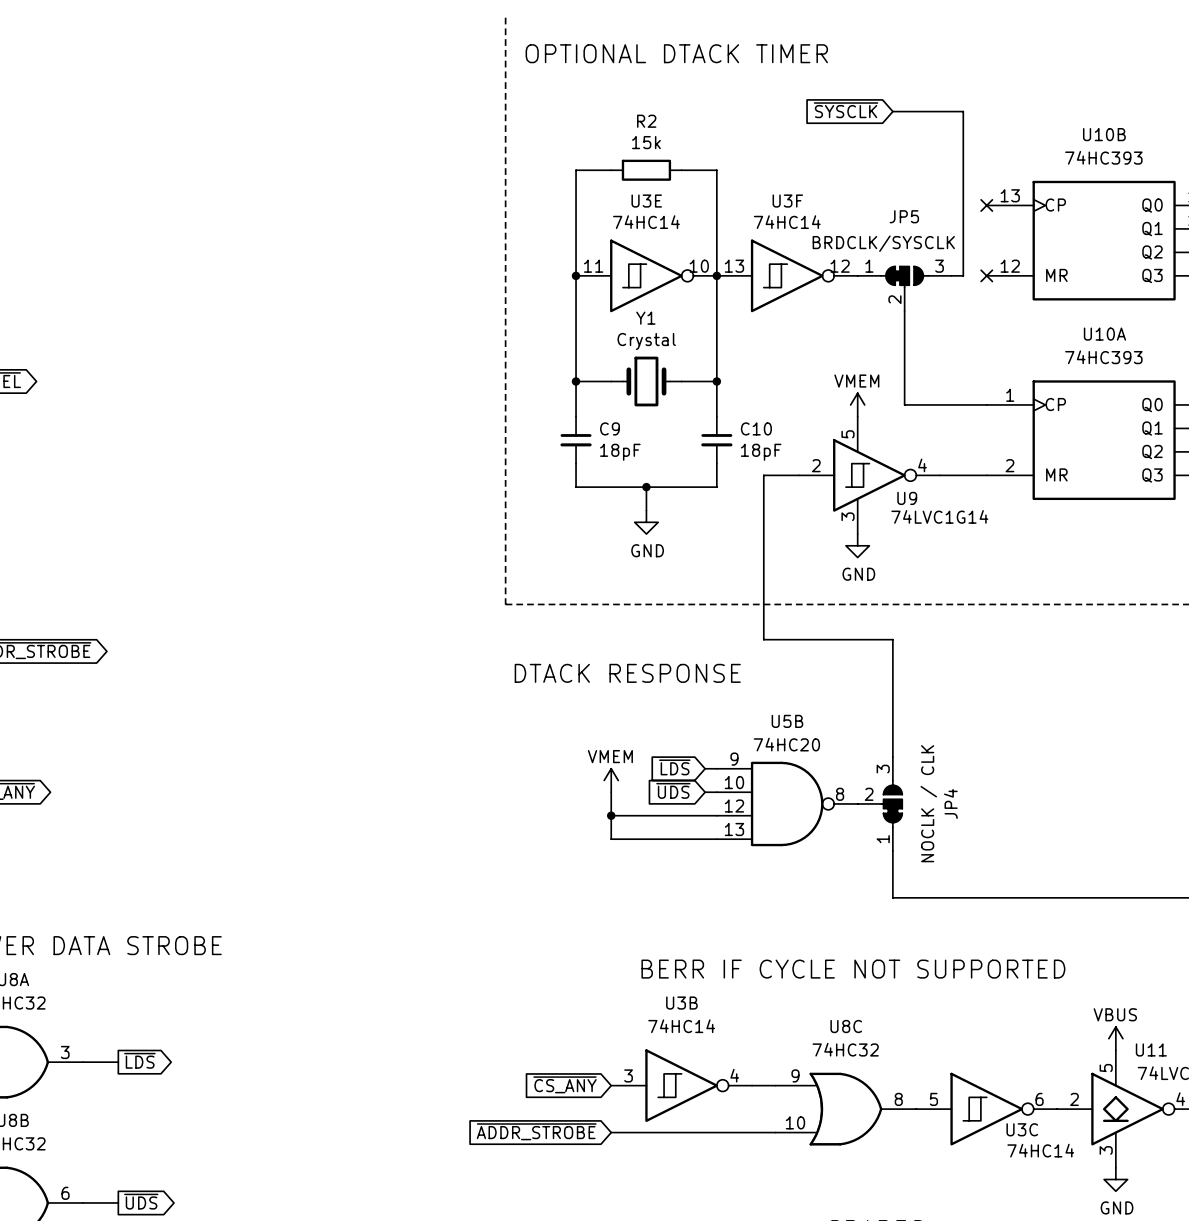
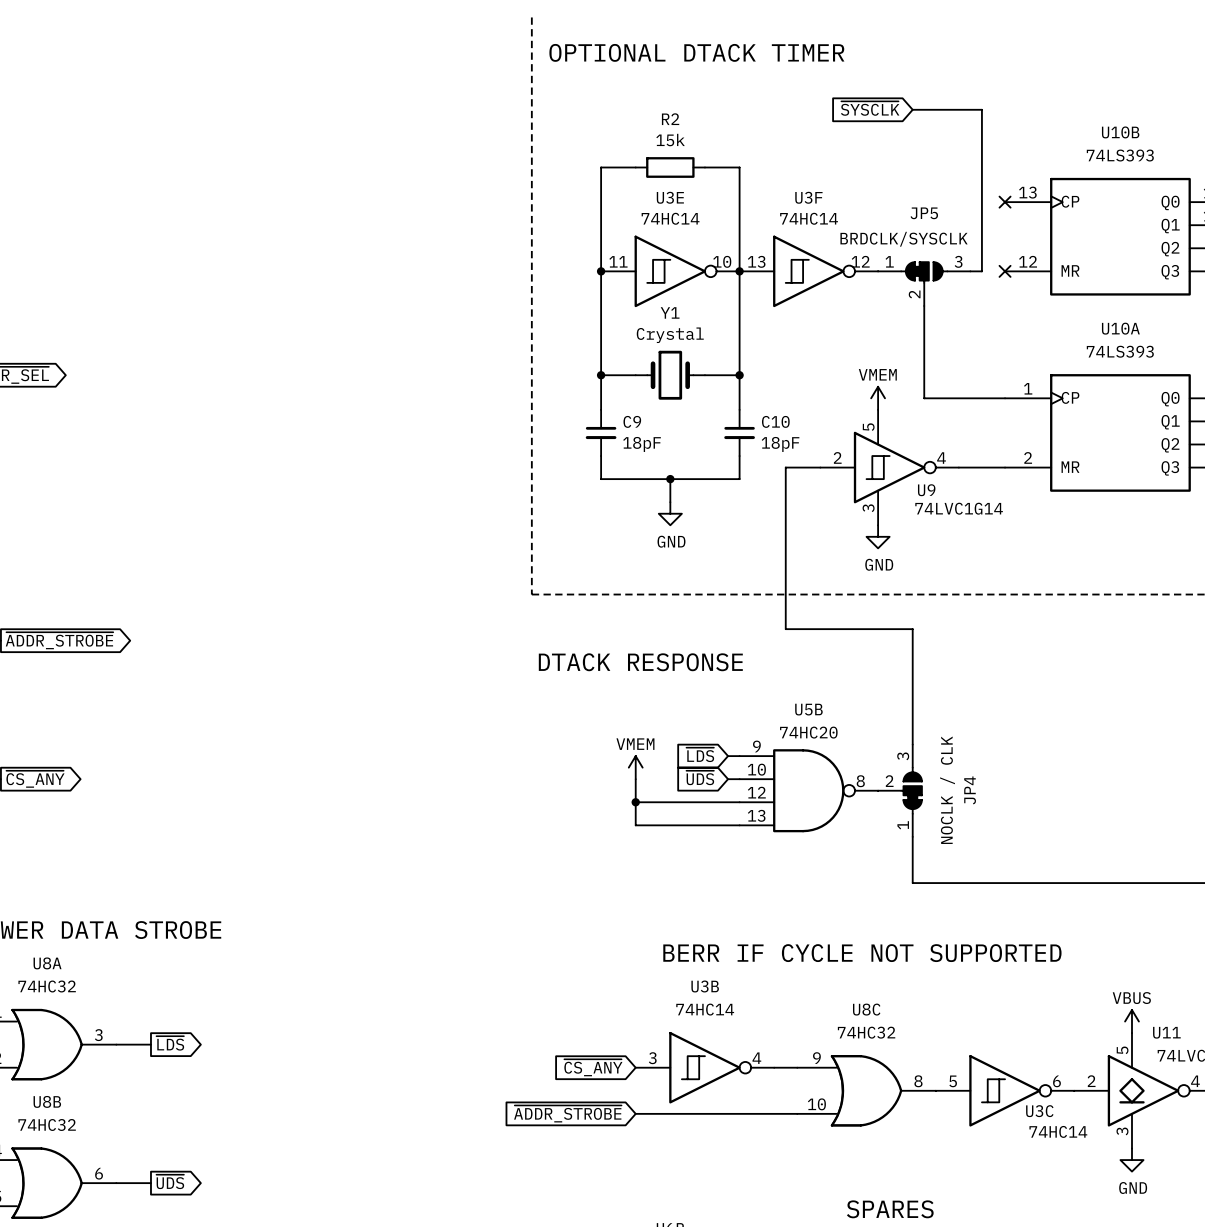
U10B value: 74HC393 (1103, 157) -> 74LS393 (1120, 155)
U10A value: 74HC393 (1103, 357) -> 74LS393 (1120, 351)

